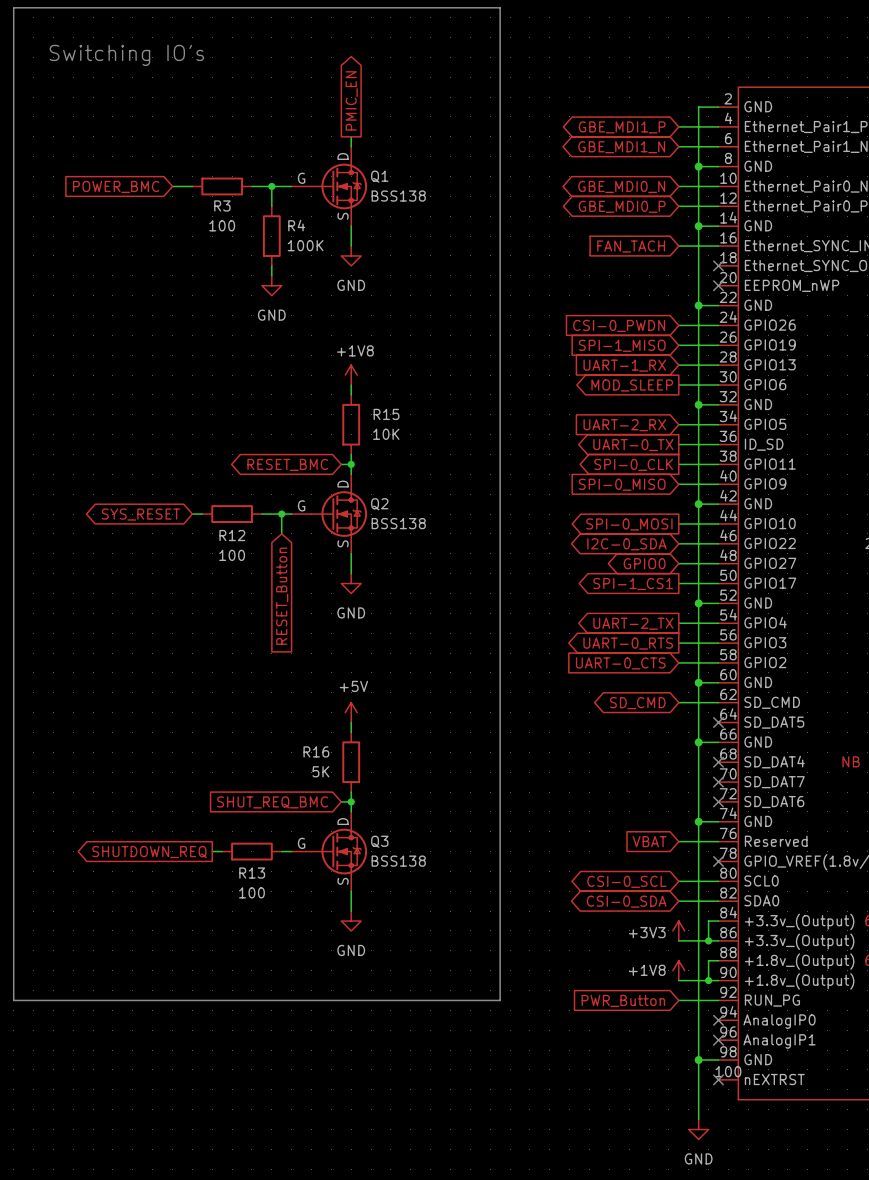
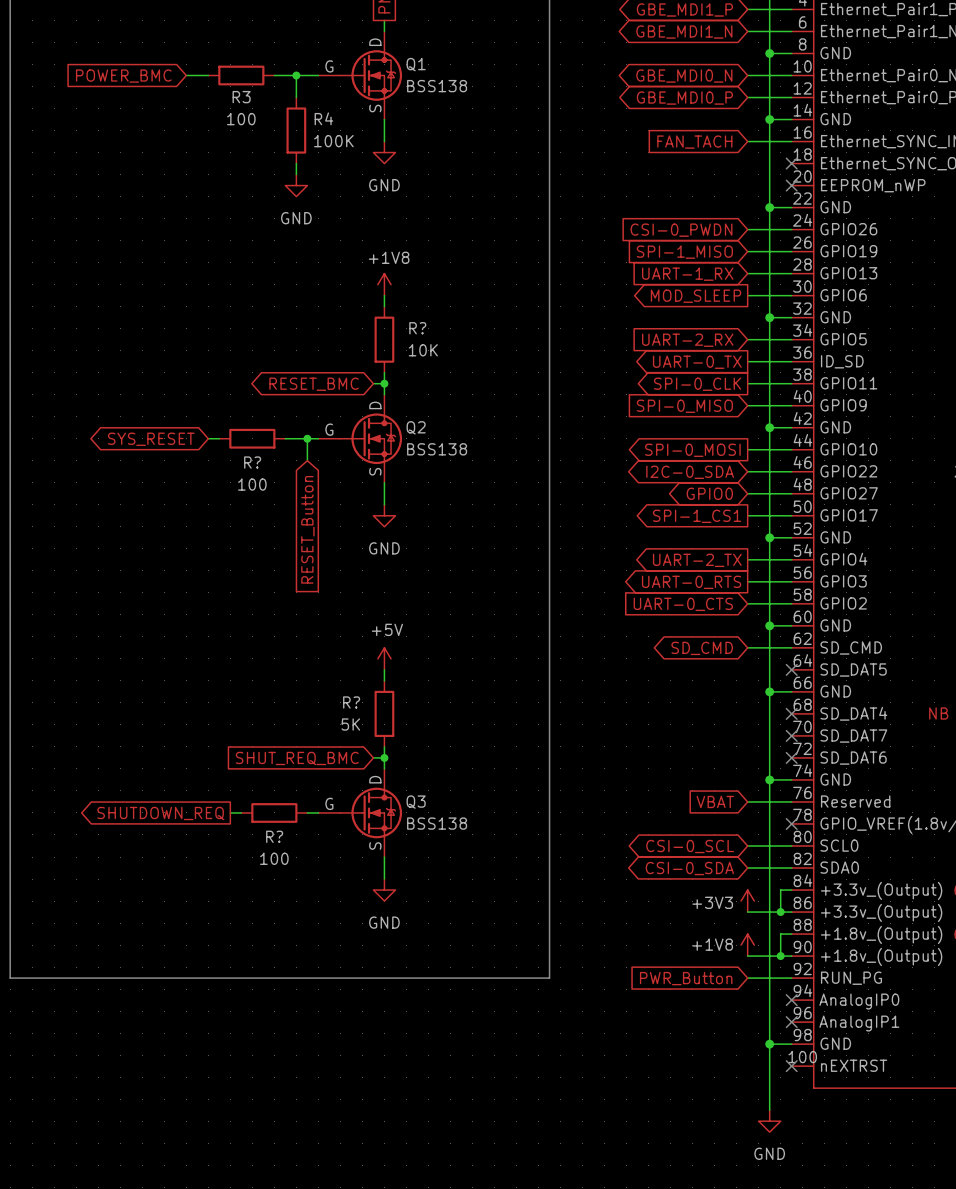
R15 name: R15 (386, 414) -> R? (417, 328)
R12 name: R12 (232, 535) -> R? (252, 462)
R16 name: R16 (316, 751) -> R? (351, 702)
R13 name: R13 (252, 873) -> R? (274, 836)

